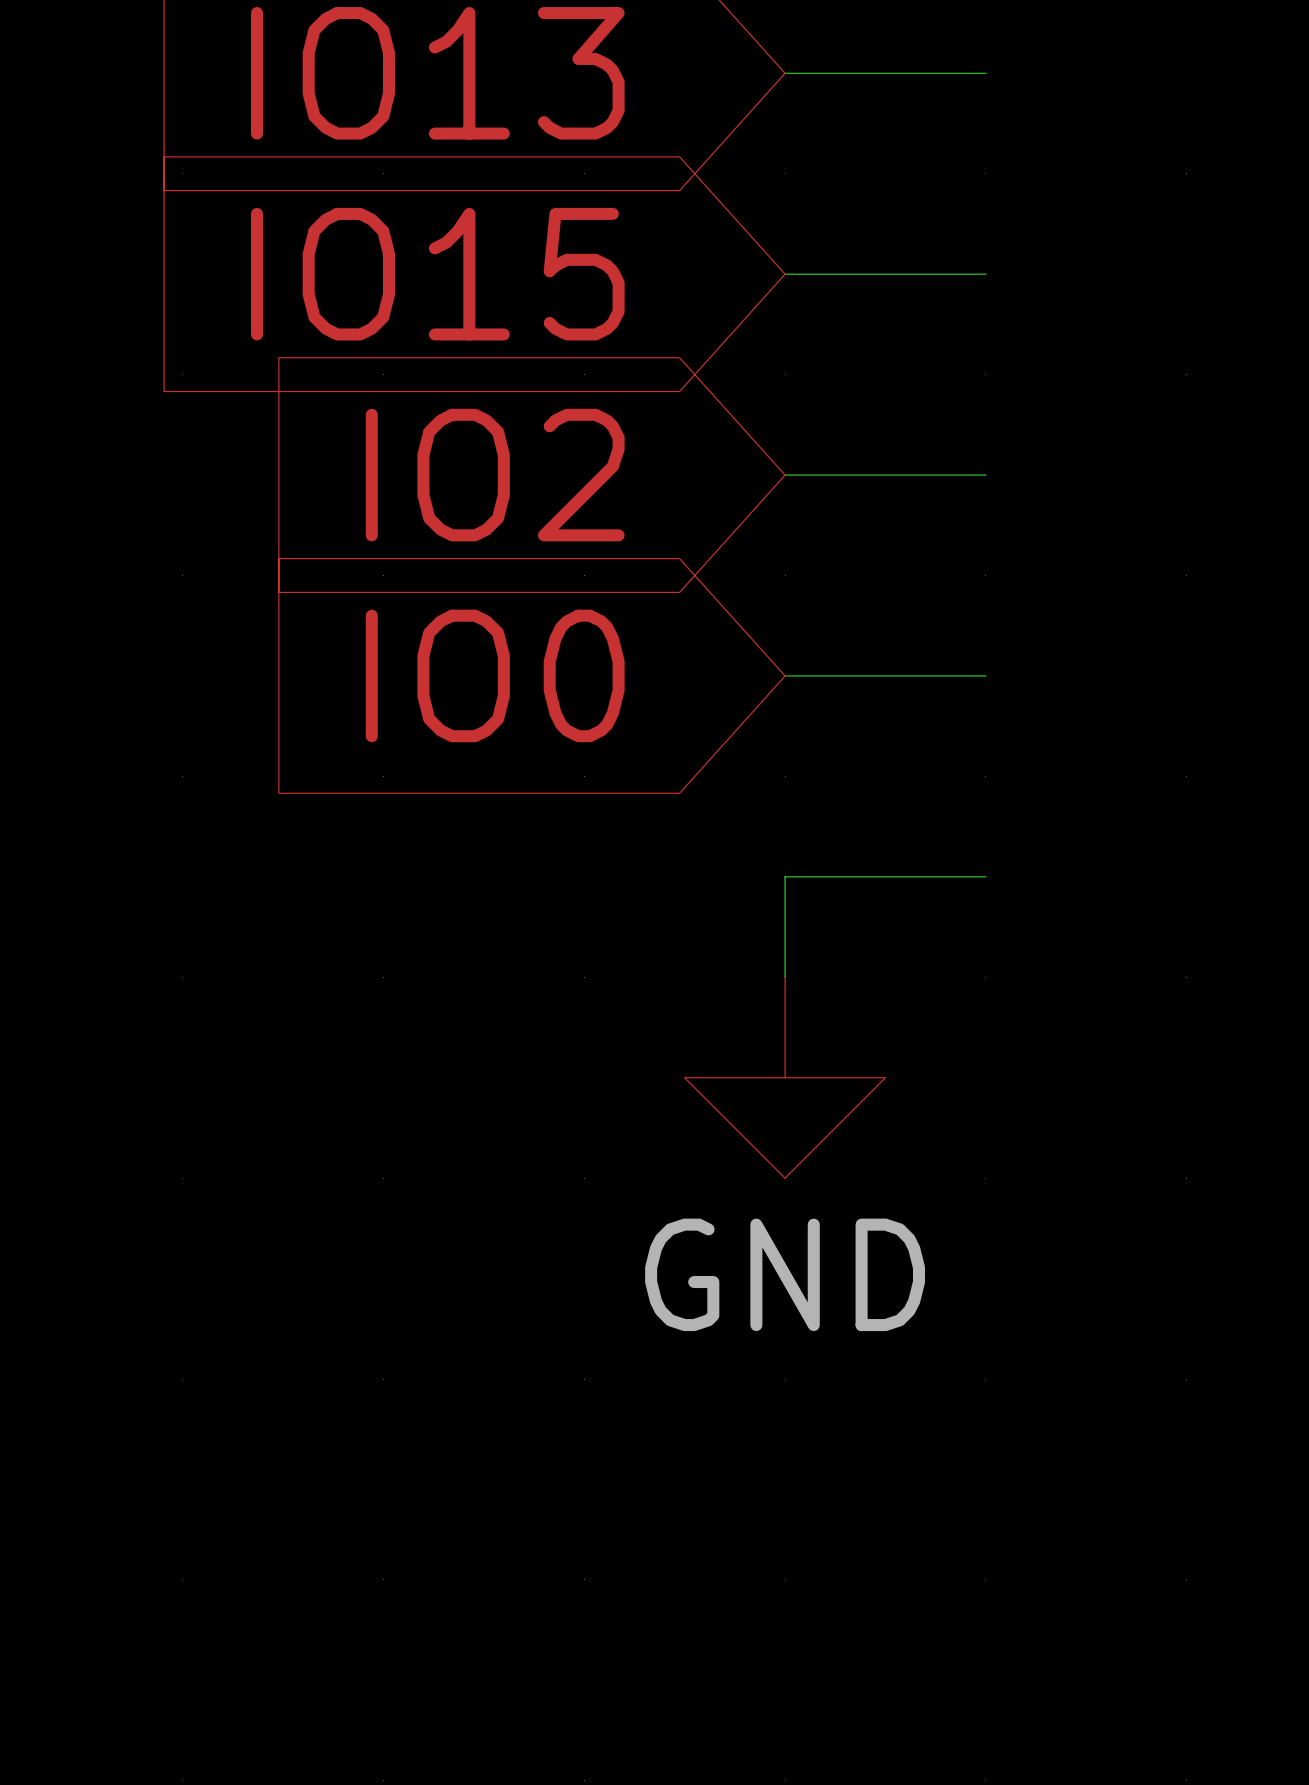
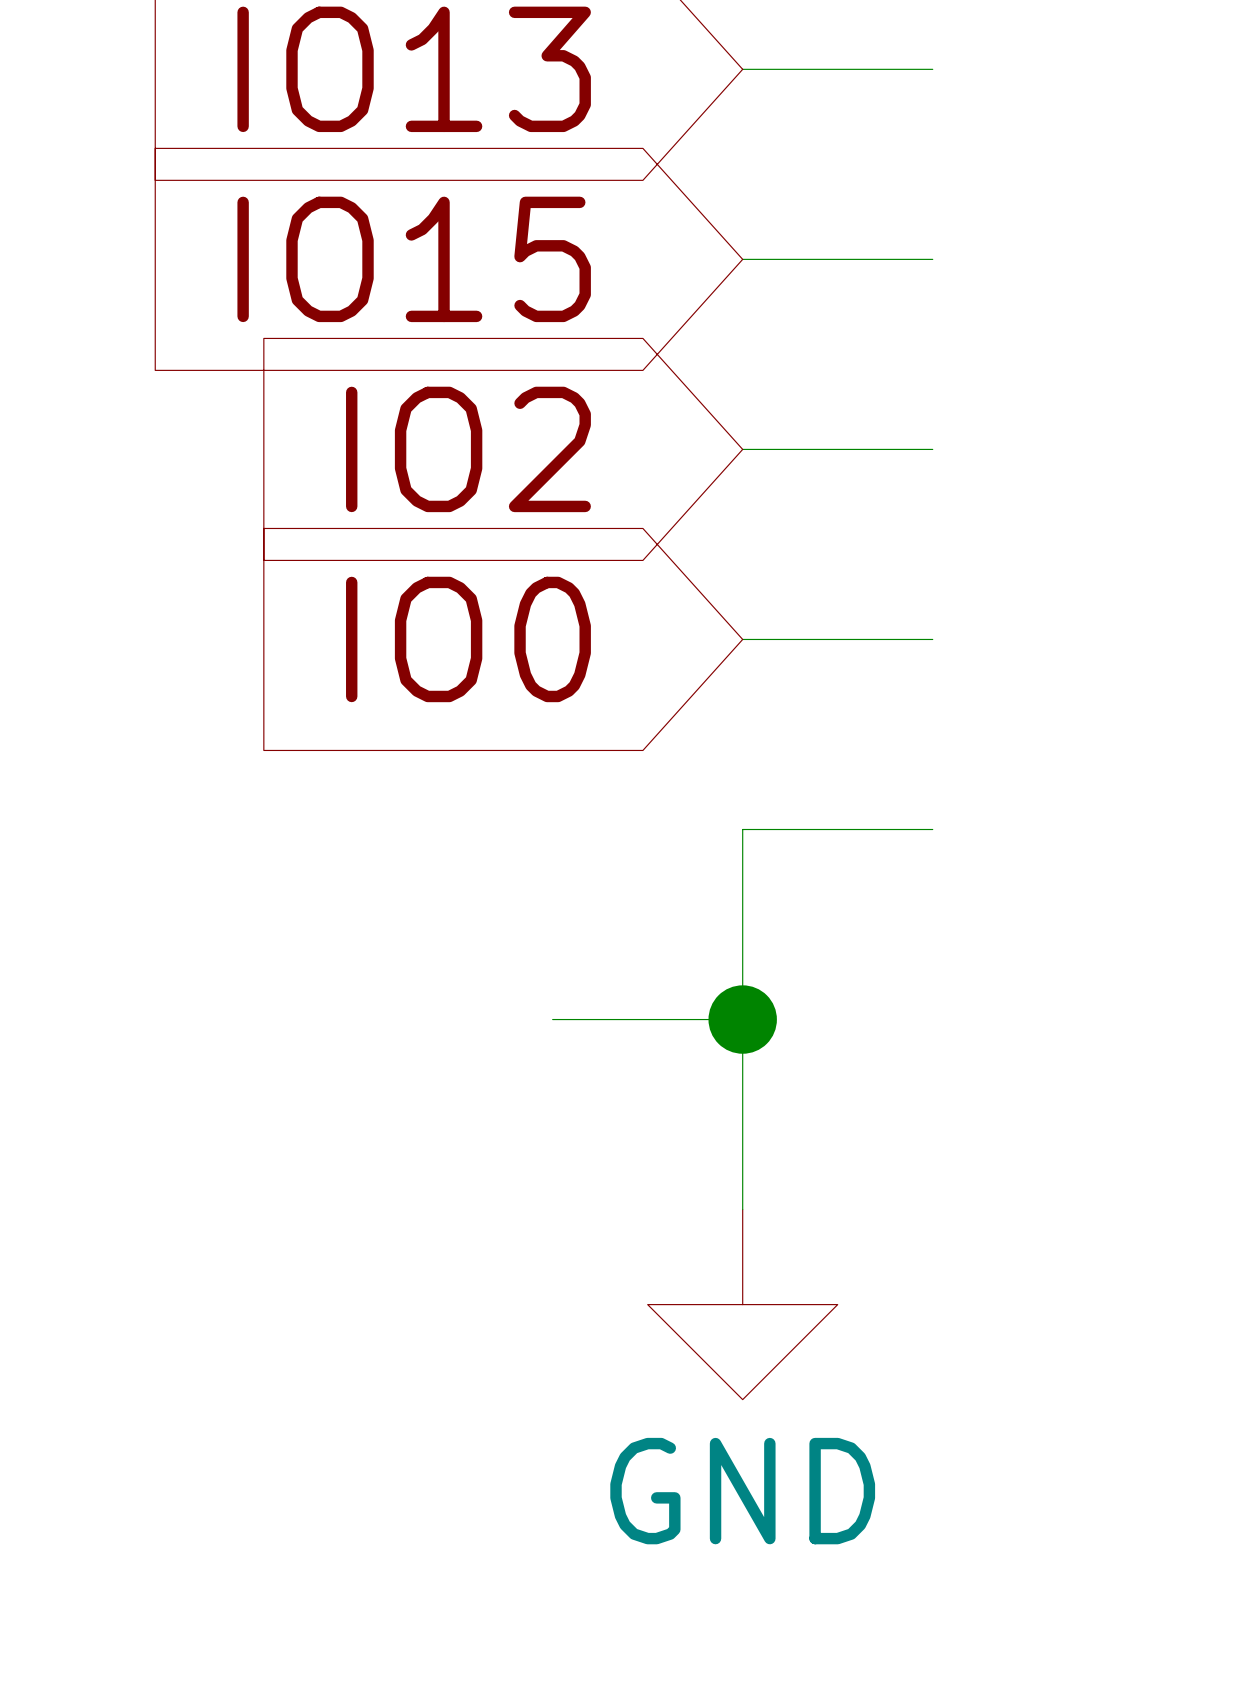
wire: none -> (742, 924) (742, 1209)
wire: none -> (552, 1019) (742, 1019)
power symbol position: GND (785, 1077) -> GND (742, 1304)
junction: none -> (742, 1019)

